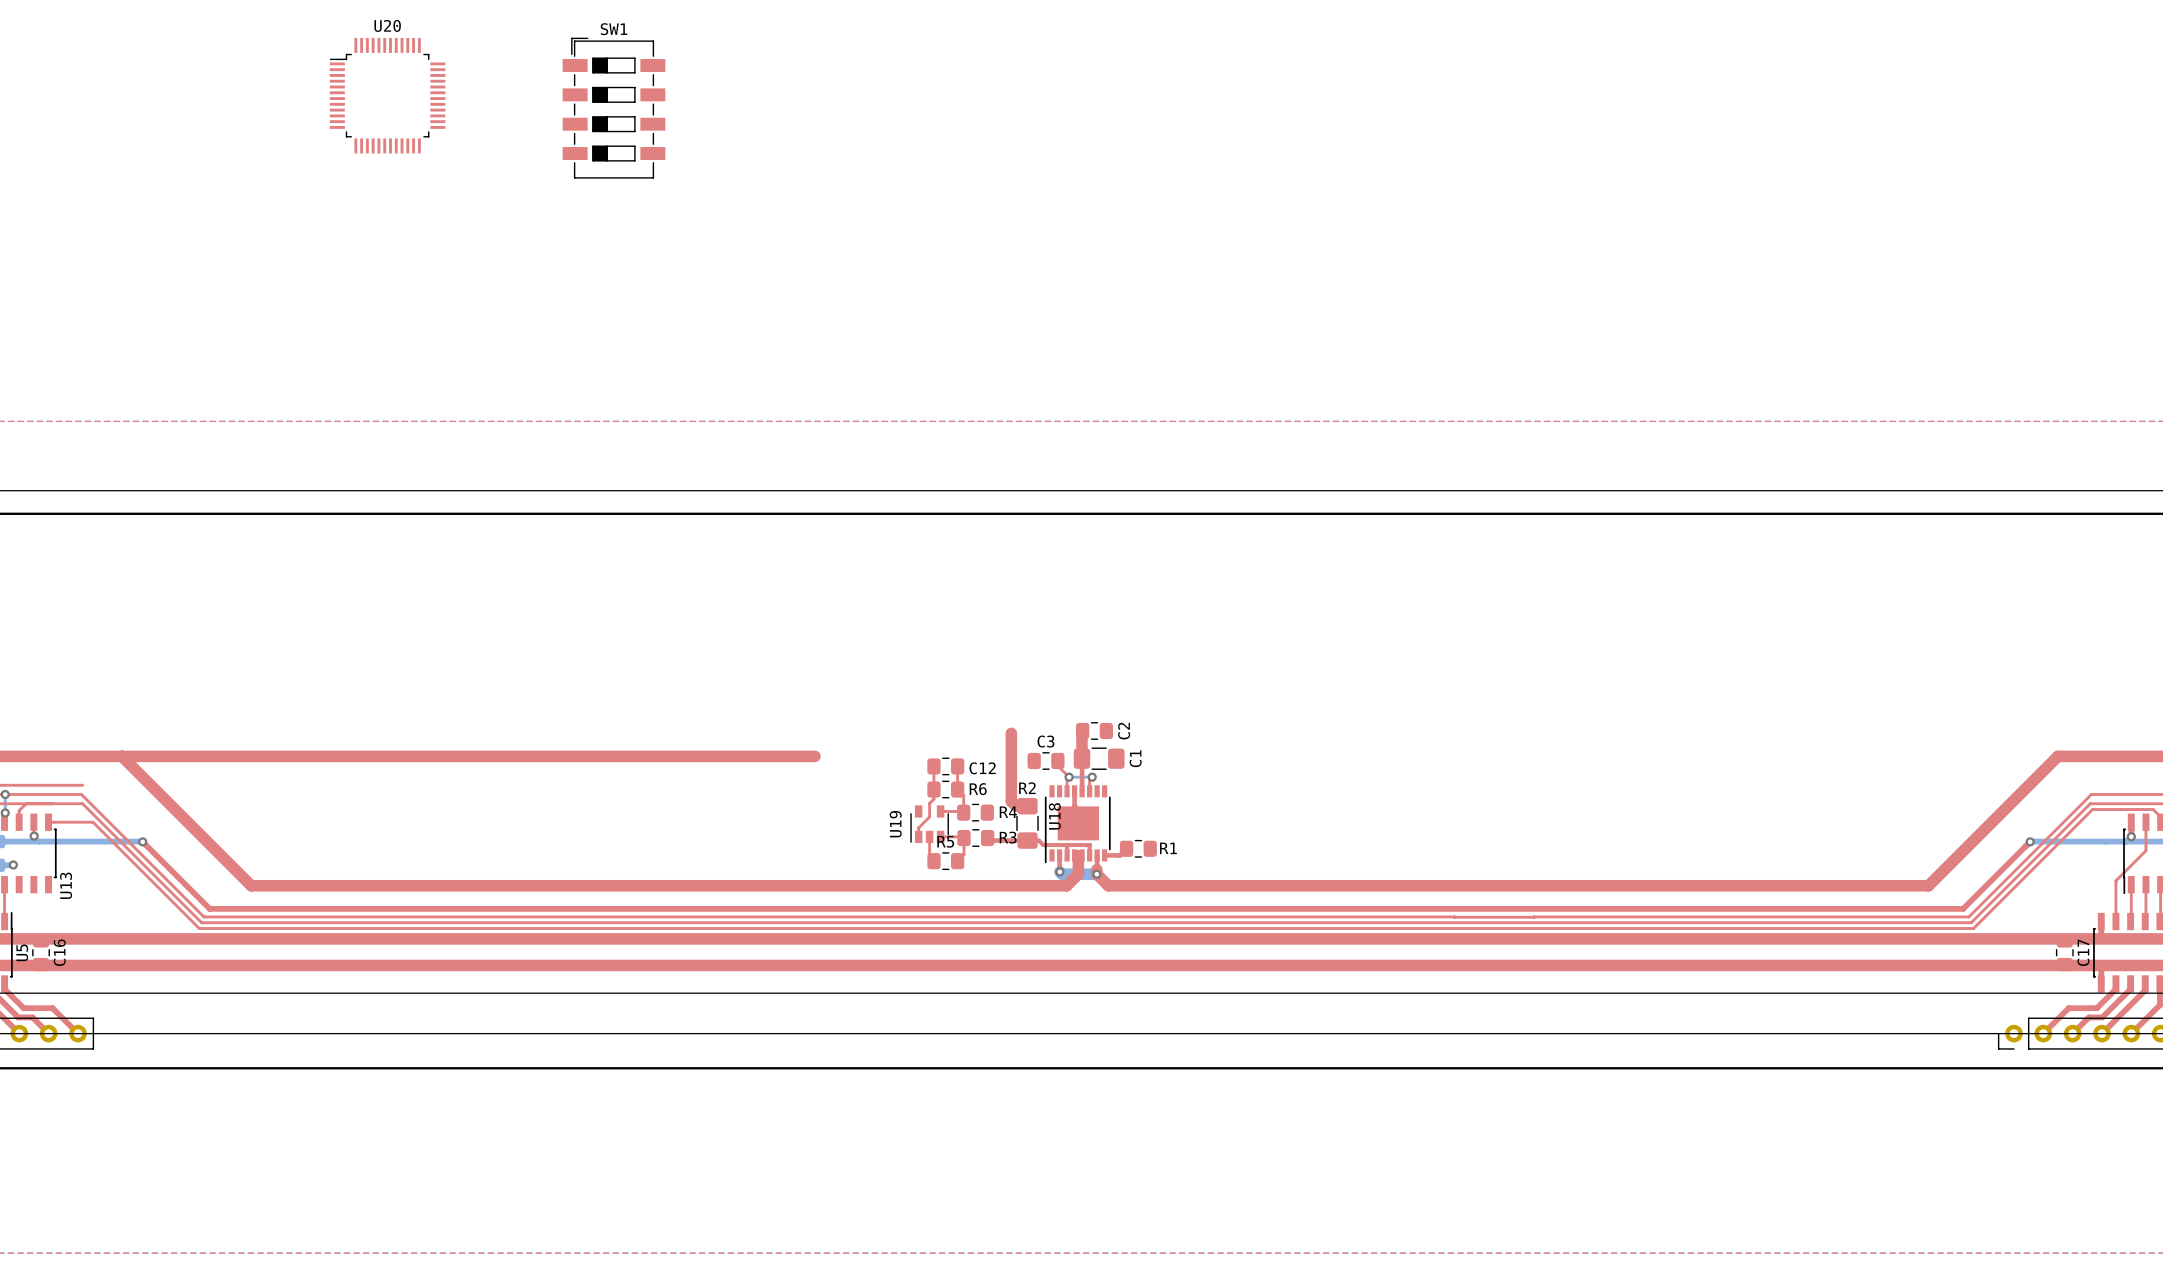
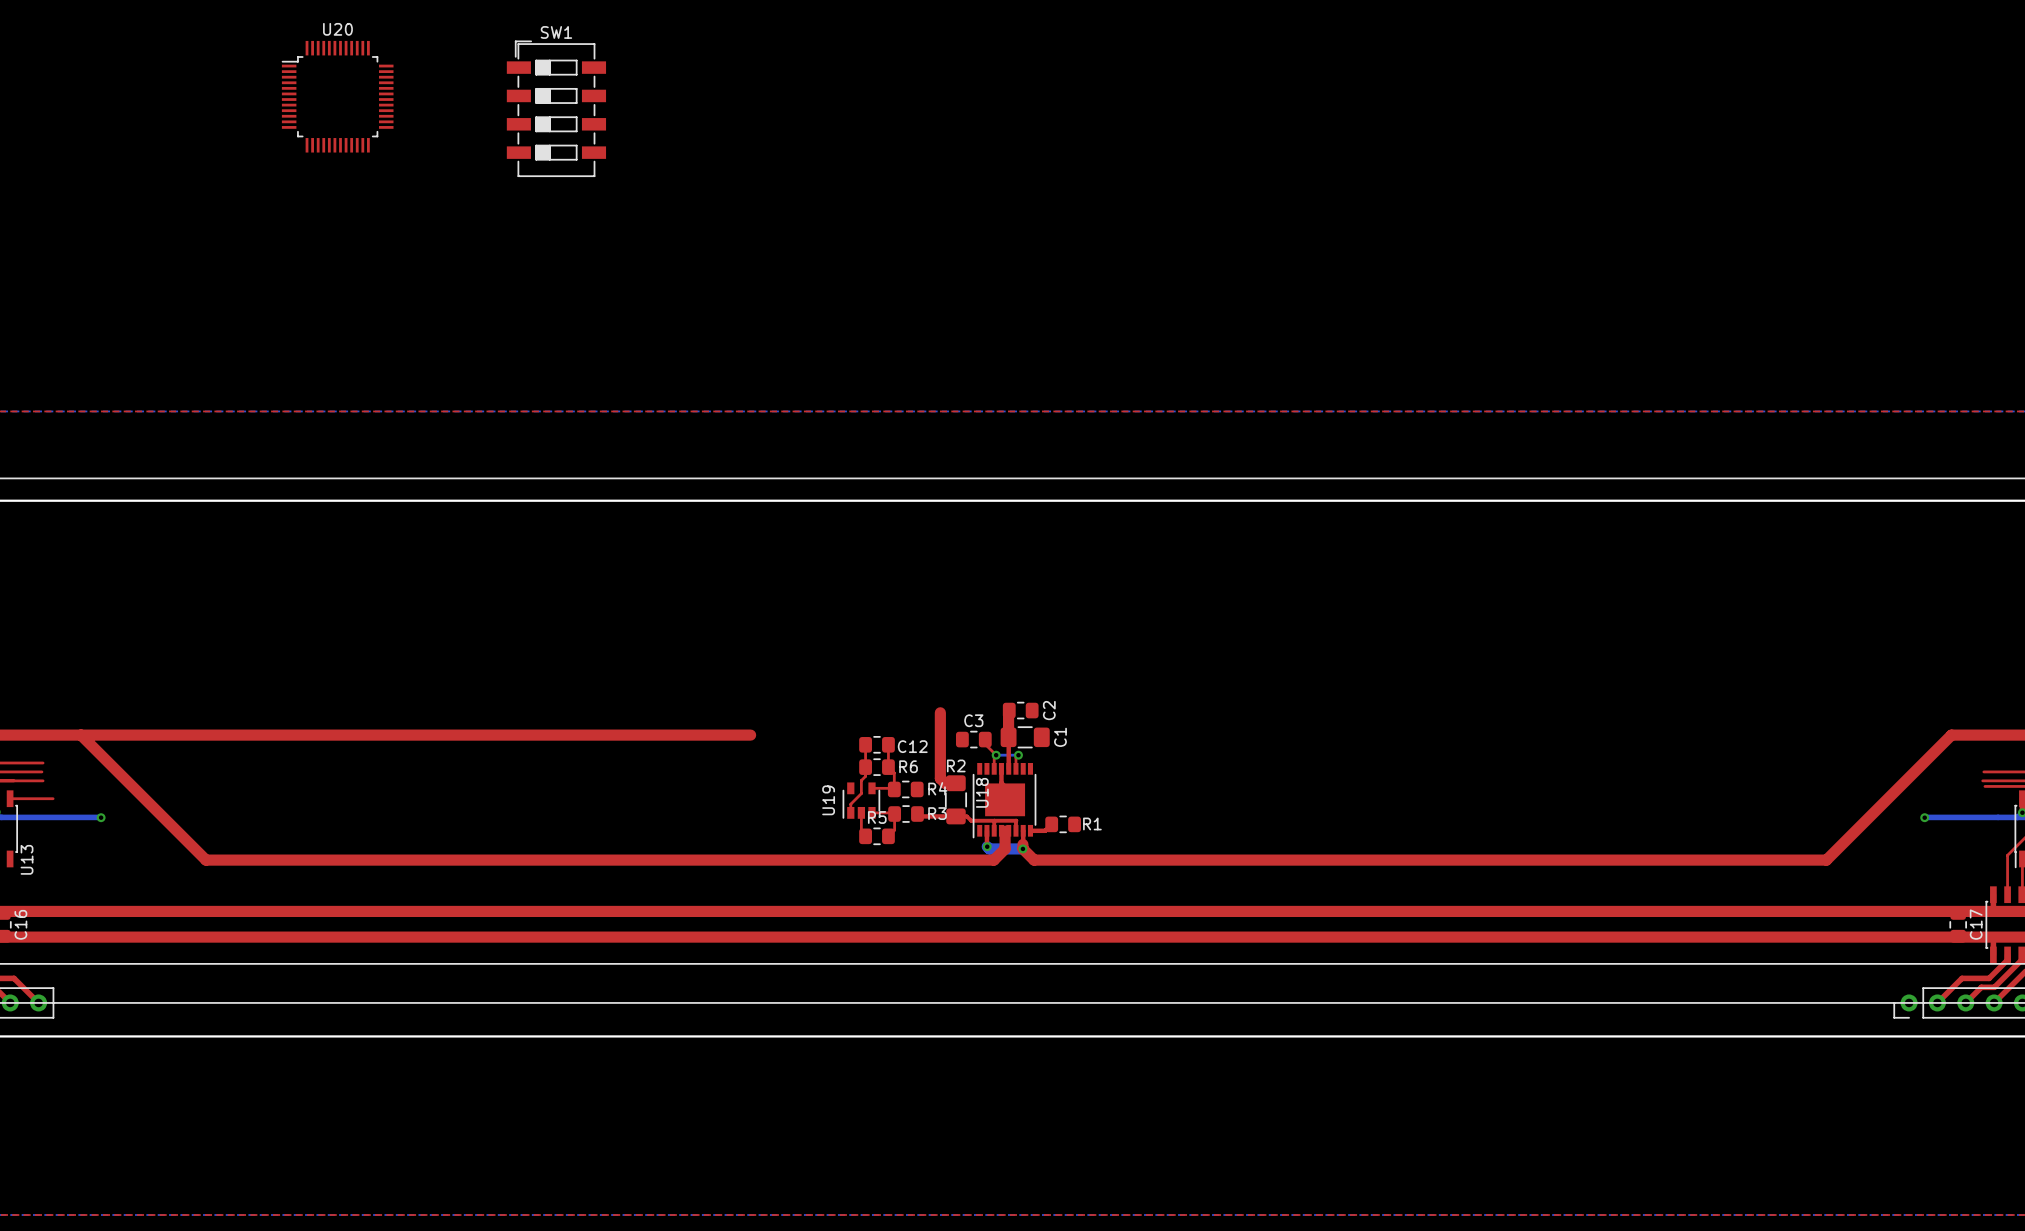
top track: (81, 794) (203, 916) (1454, 917) (1968, 916) (2091, 794) -> none
top track: (82, 803) (201, 922) (1971, 922) (2090, 803) -> none
top track: (2092, 809) (1973, 928) (199, 928) (93, 822) -> none
top track: (142, 841) (209, 908) (1963, 908) (2030, 841) -> none

